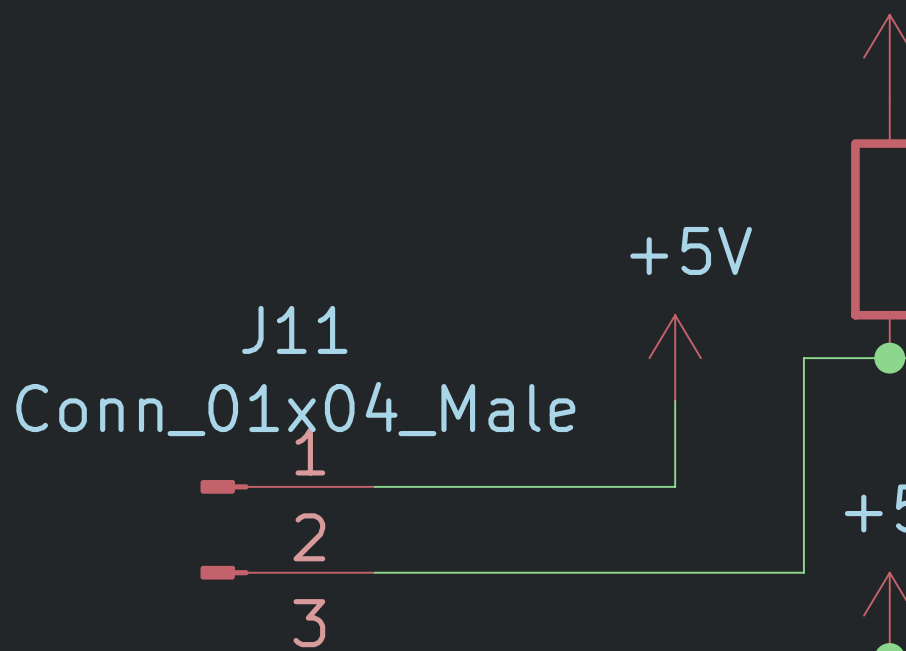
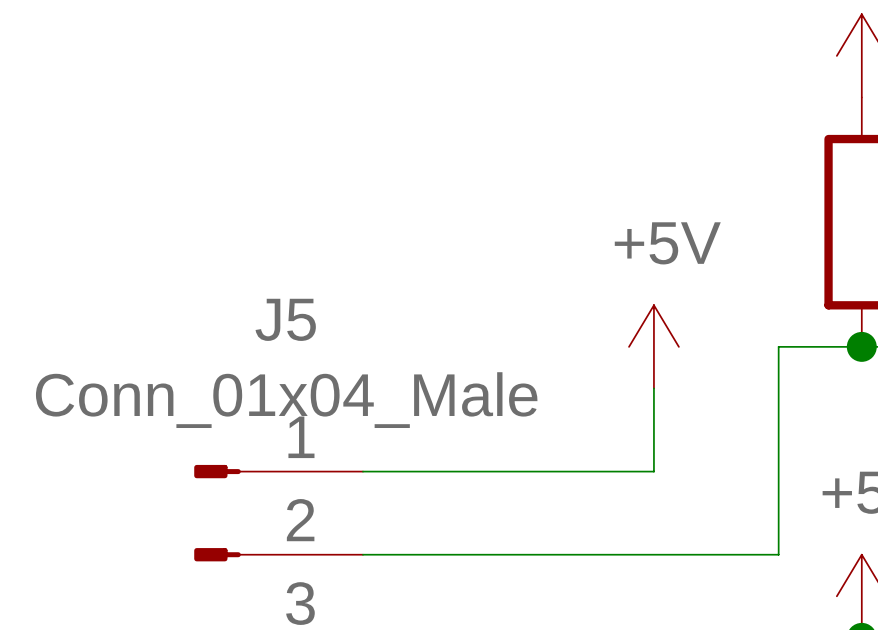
J11 name: J11 (294, 329) -> J5 (285, 319)

